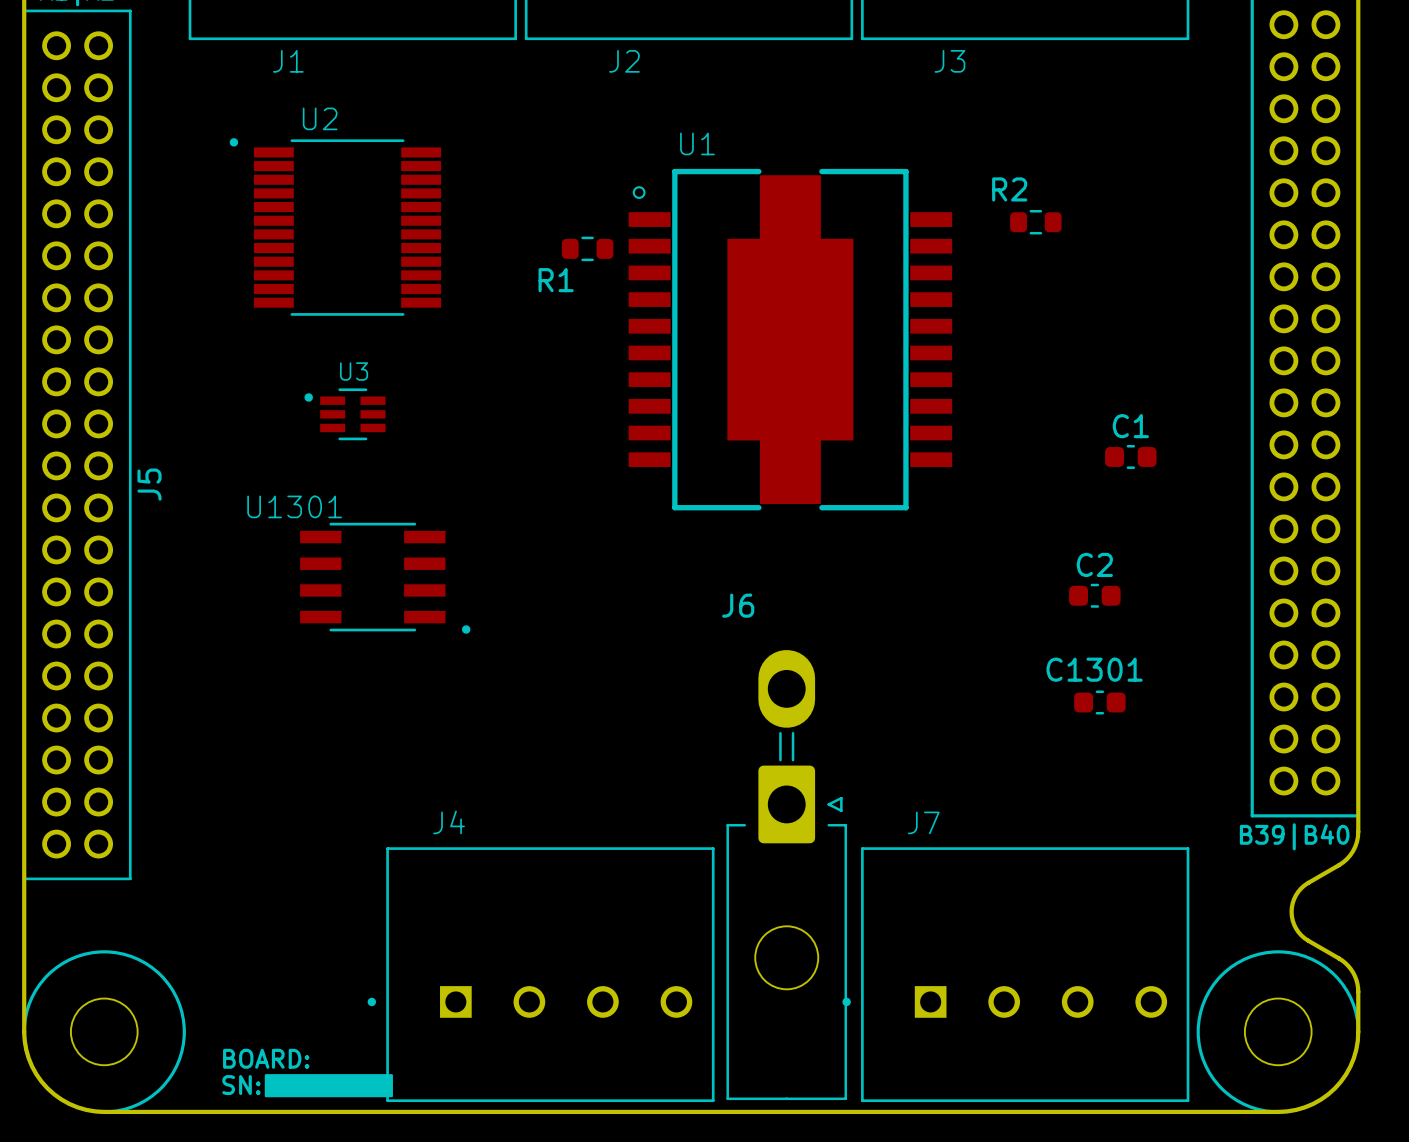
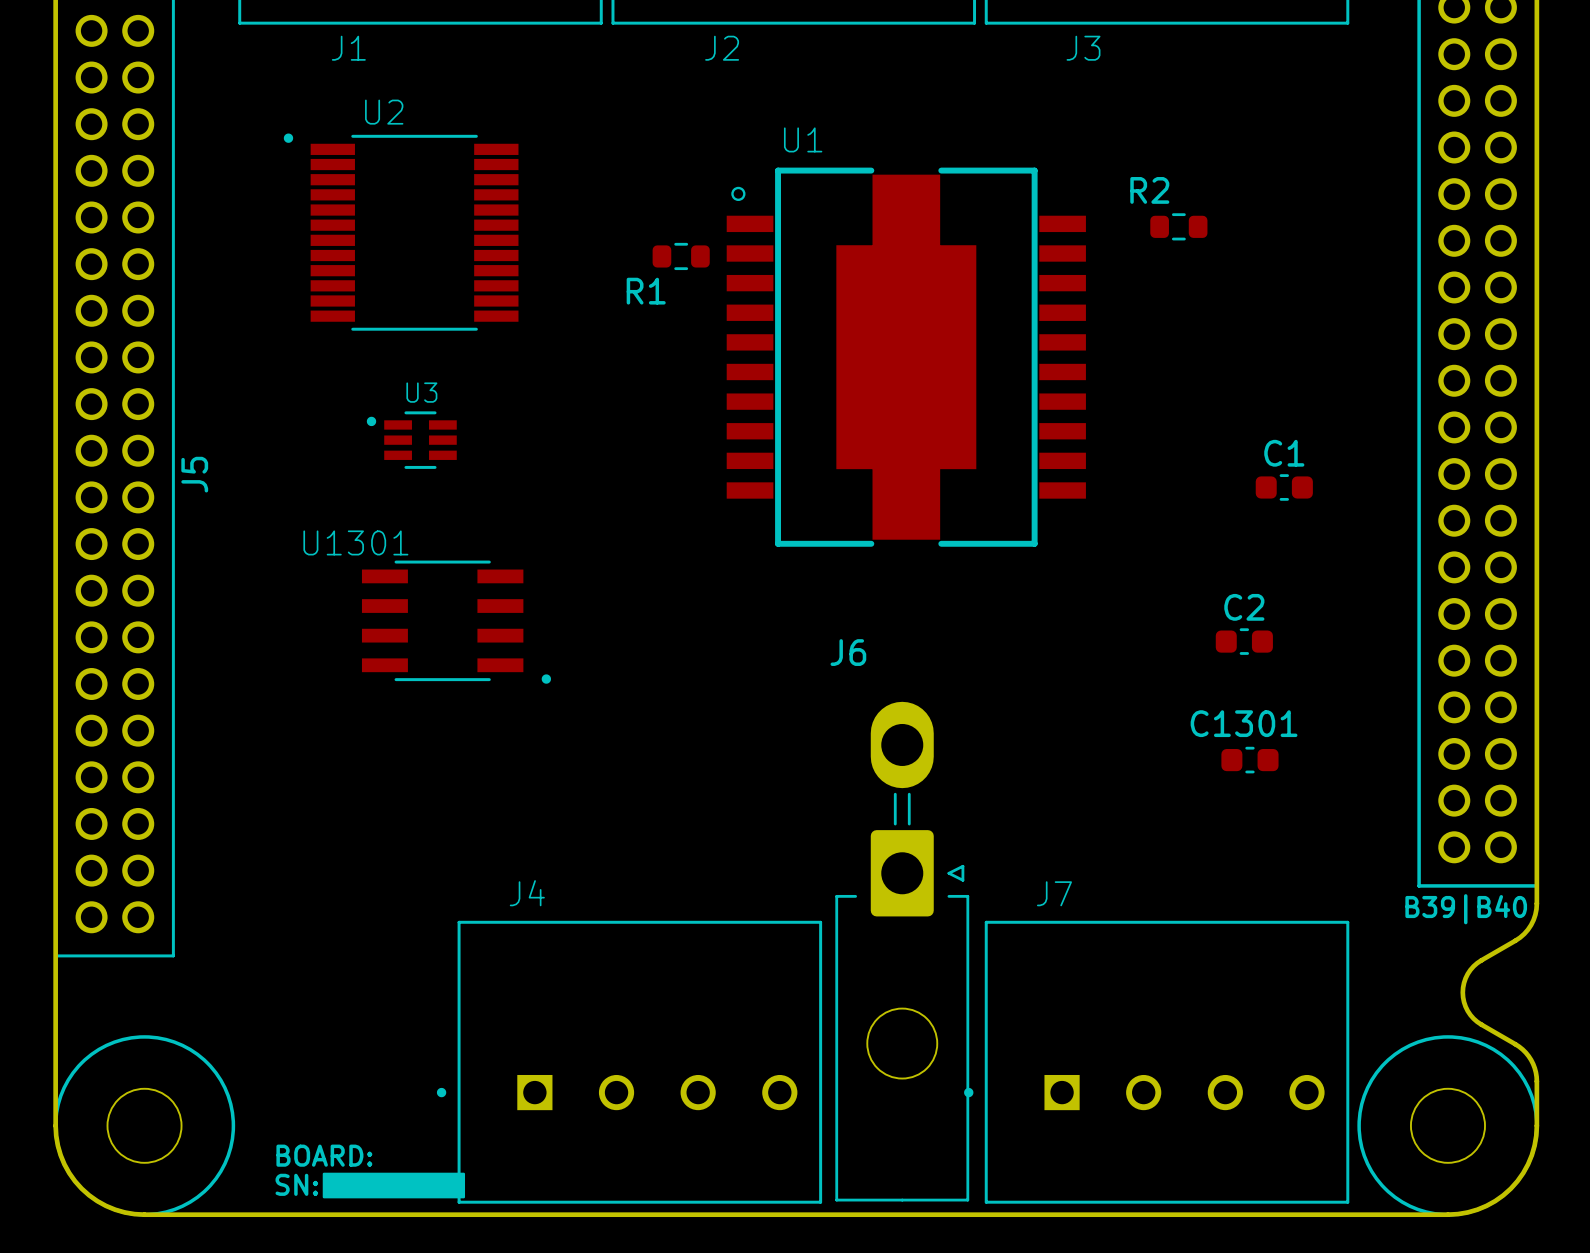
J5 name position: J5 (149, 484) -> J5 (194, 474)

